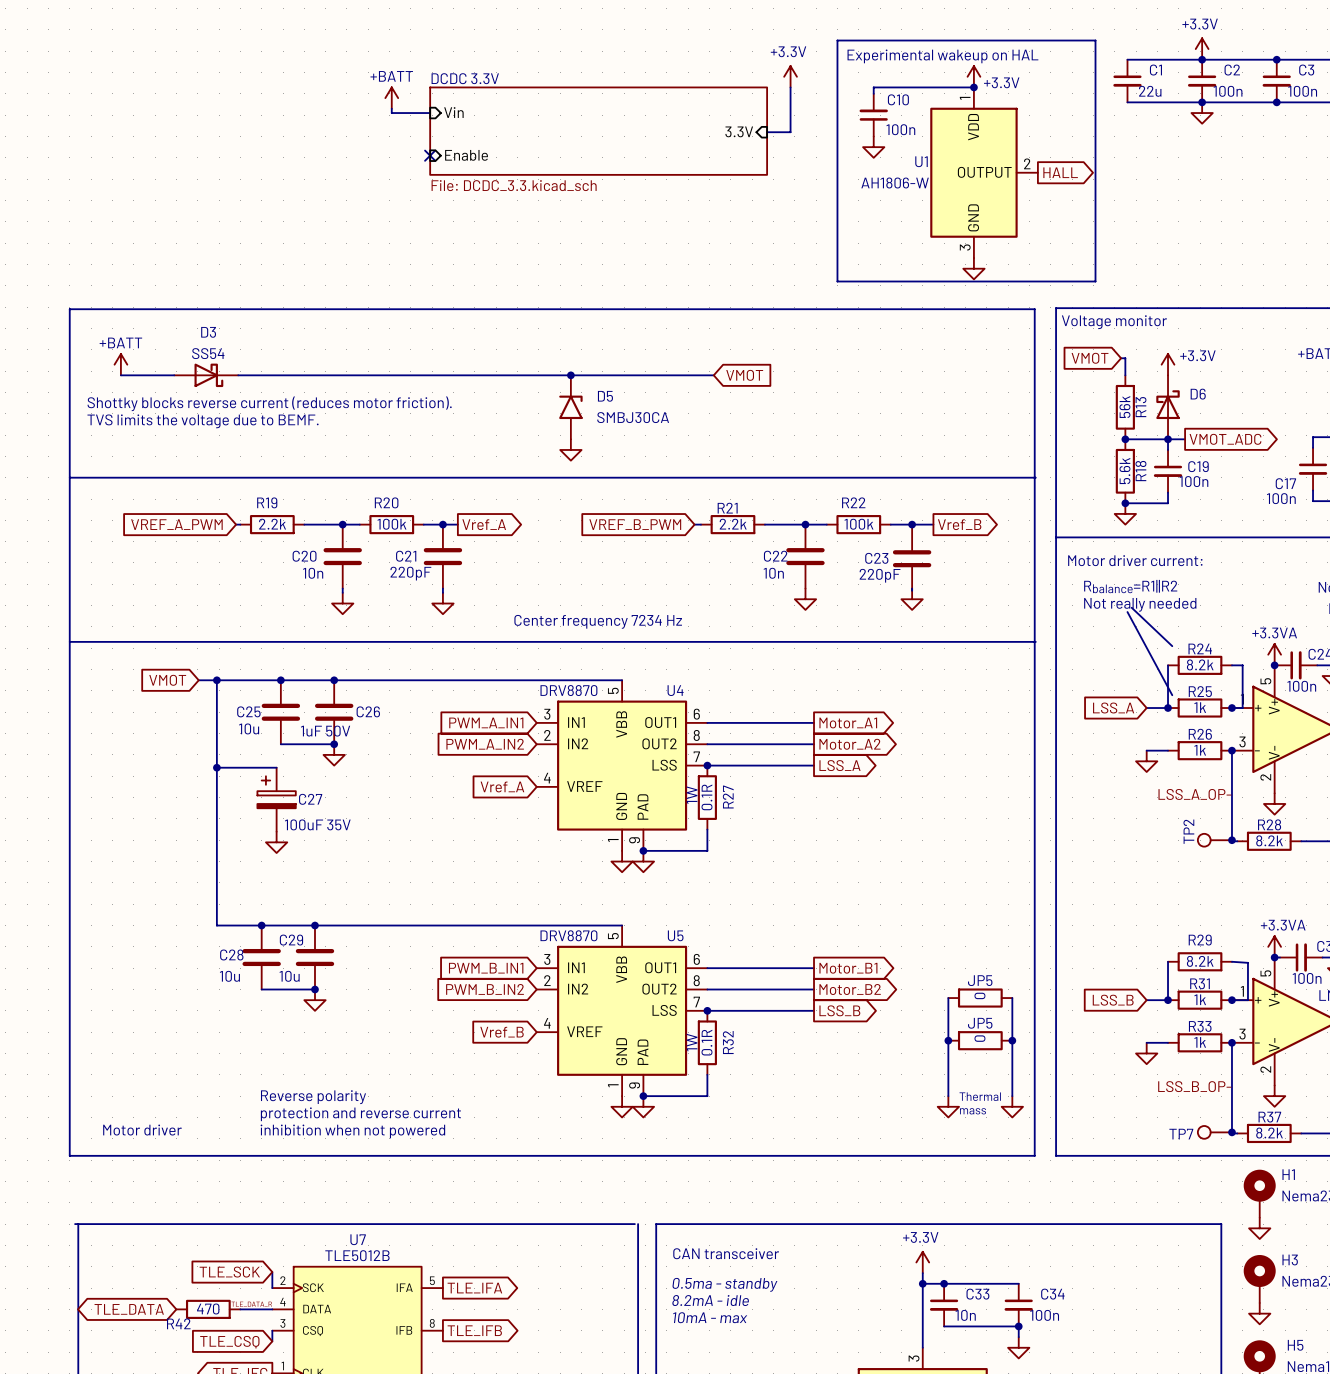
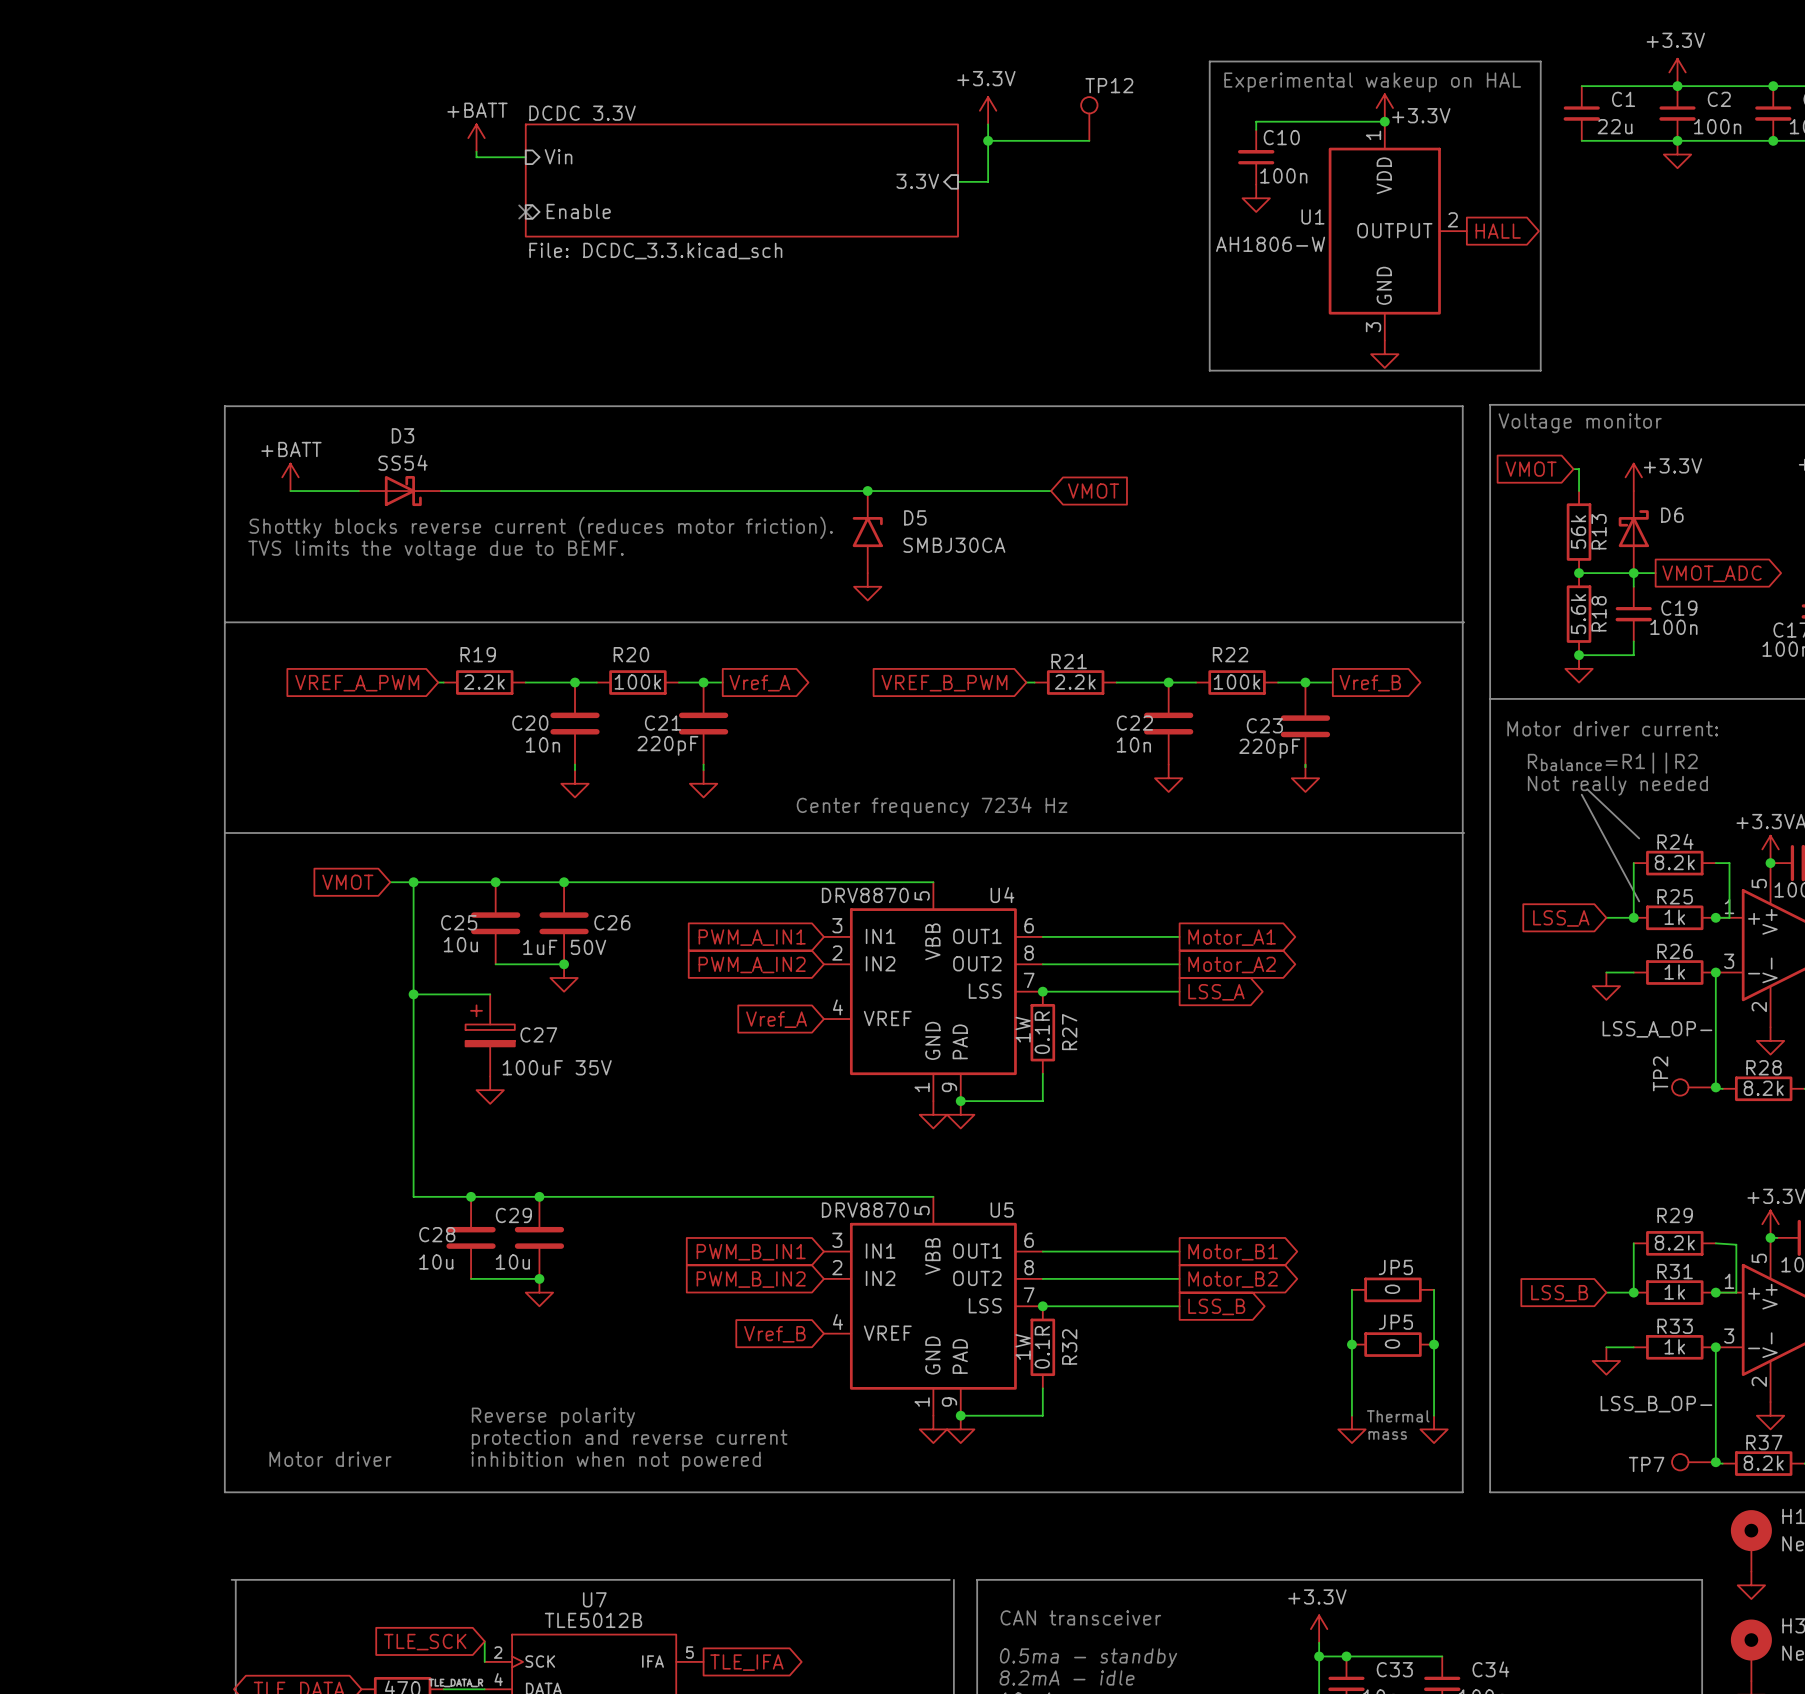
power symbol position: +3.3V (790, 76) -> +3.3V (988, 110)
TP12: none -> (1089, 118)
wire: (790, 87) (790, 132) (767, 132) -> (988, 124) (988, 181) (958, 181)
power symbol position: +BATT (391, 98) -> +BATT (476, 138)
wire: none -> (988, 140) (1089, 140)
junction: none -> (988, 140)
wire: (391, 108) (391, 113) (430, 113) -> (476, 151) (476, 157) (525, 157)
sheet pin position: Vin (453, 112) -> Vin (558, 156)
sheet DCDC 3.3V position: (598, 131) -> (741, 180)
sheet pin position: 3.3V (739, 131) -> 3.3V (917, 181)
no-connect mark: (430, 155) -> none
sheet pin position: Enable (466, 155) -> Enable (578, 211)
no-connect mark: none -> (525, 211)

